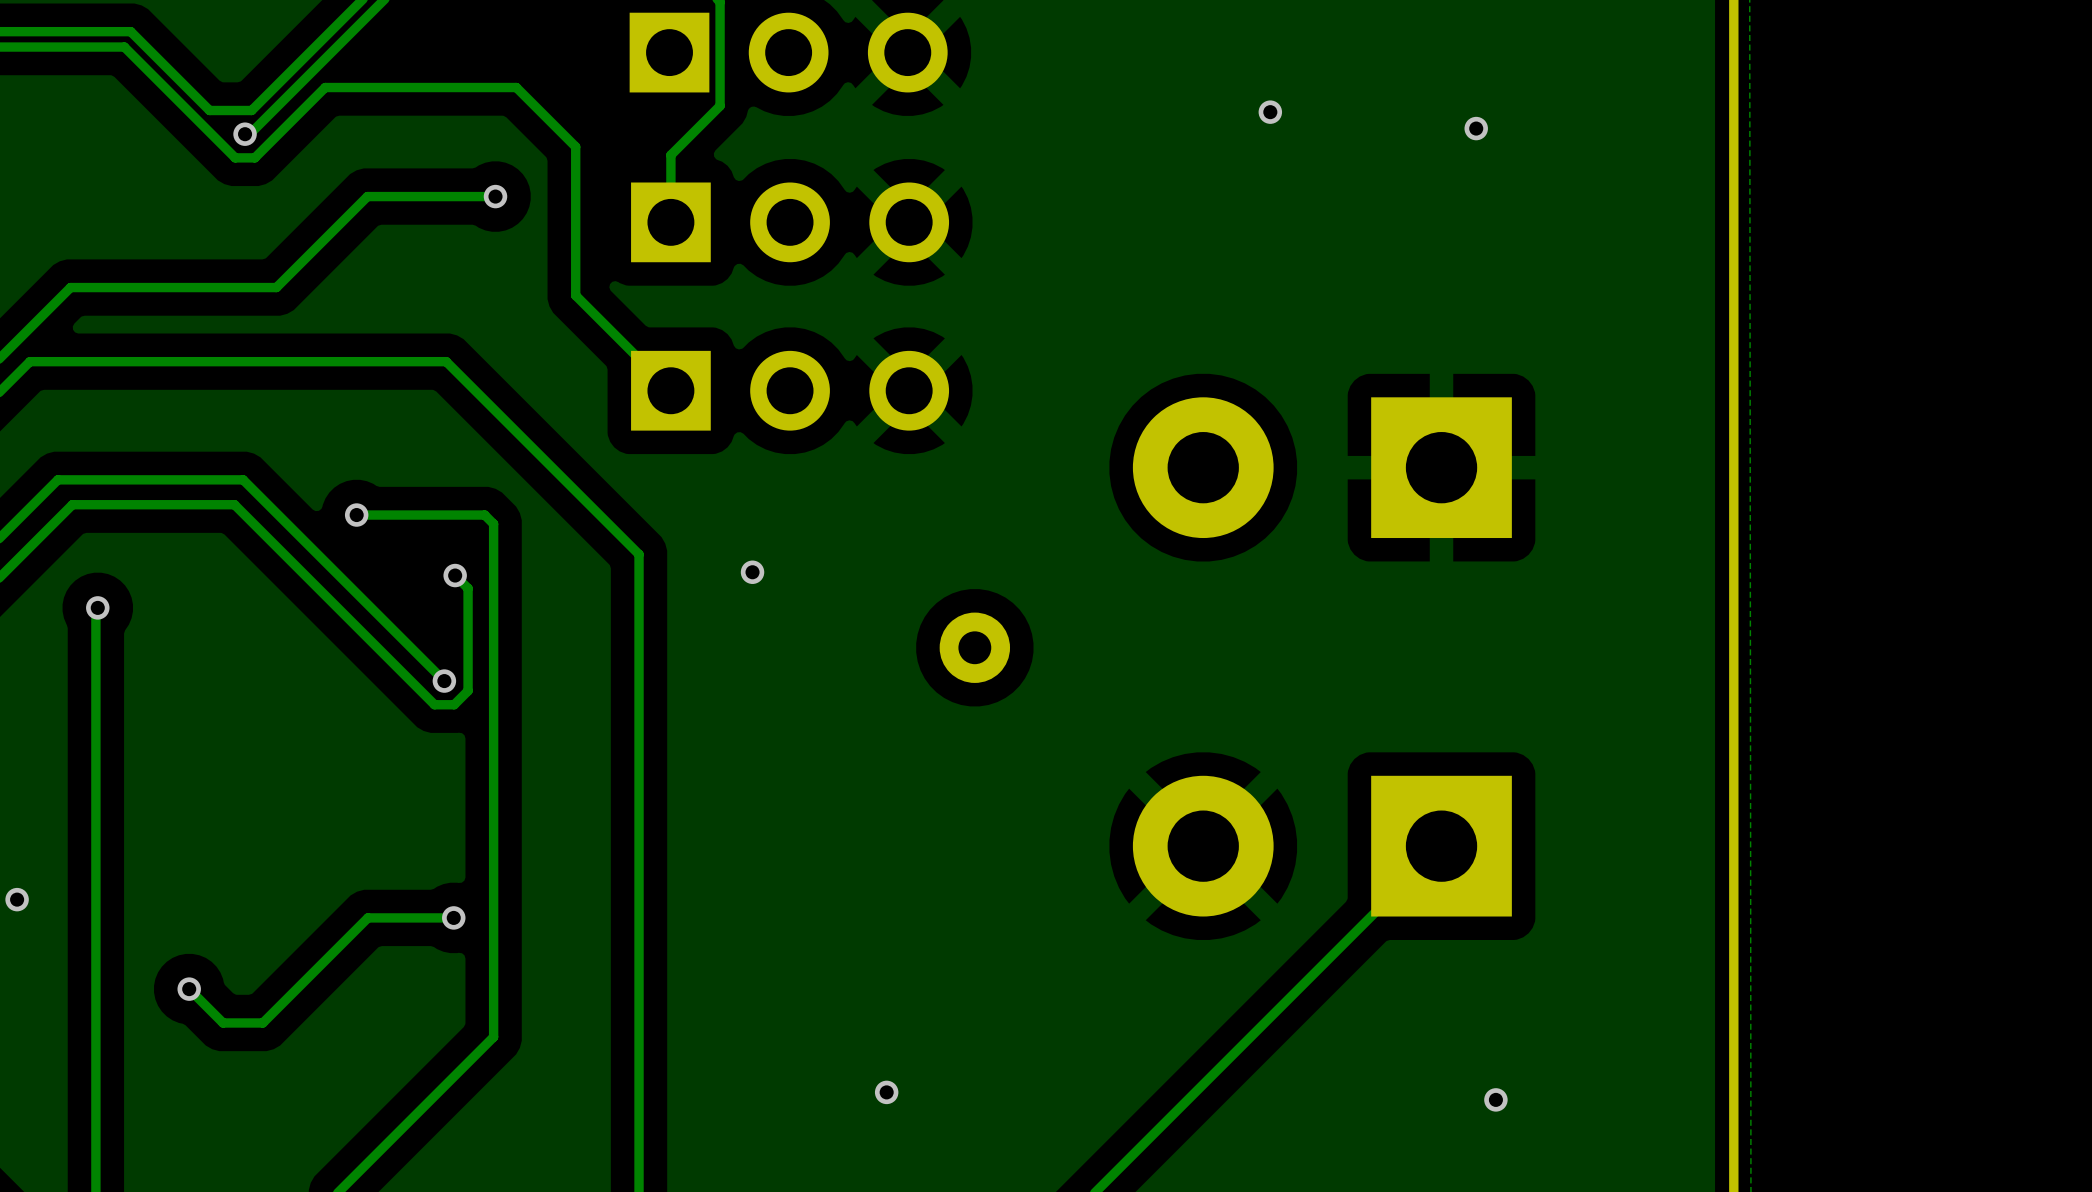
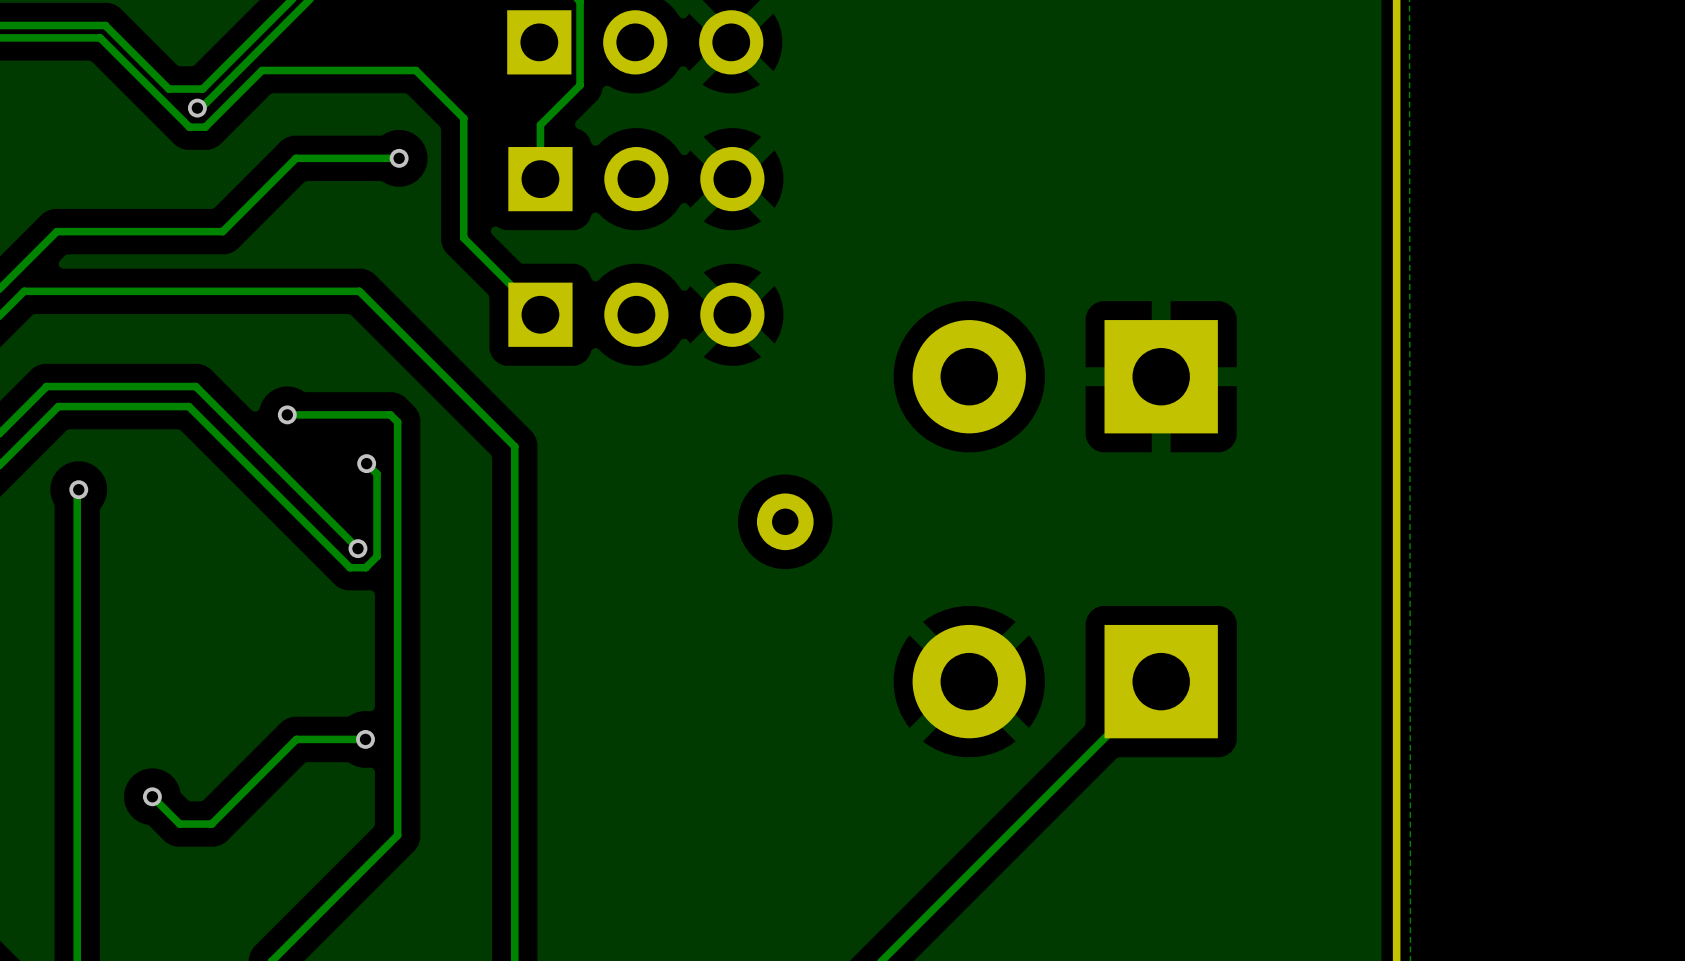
via: (1270, 112) -> none
via: (1476, 128) -> none
via: (752, 572) -> none
via: (17, 899) -> none
via: (886, 1092) -> none
via: (1495, 1099) -> none

